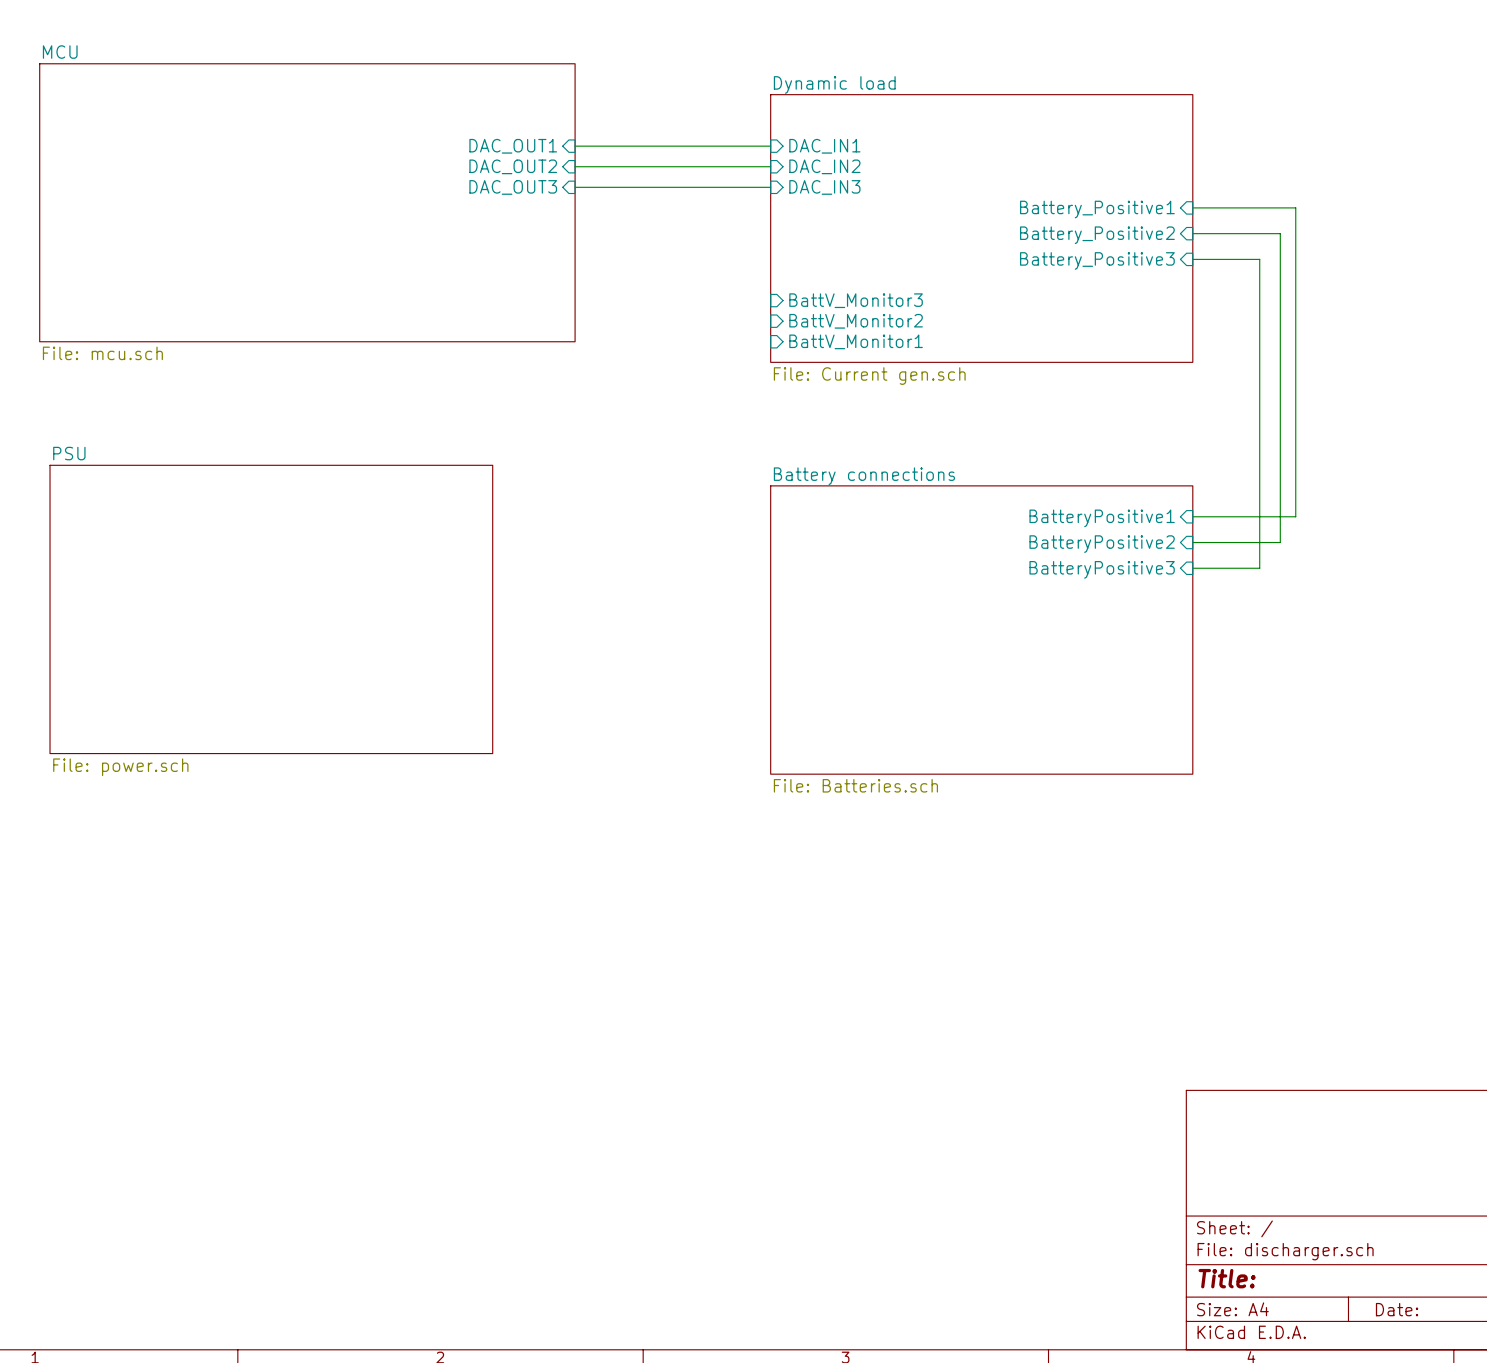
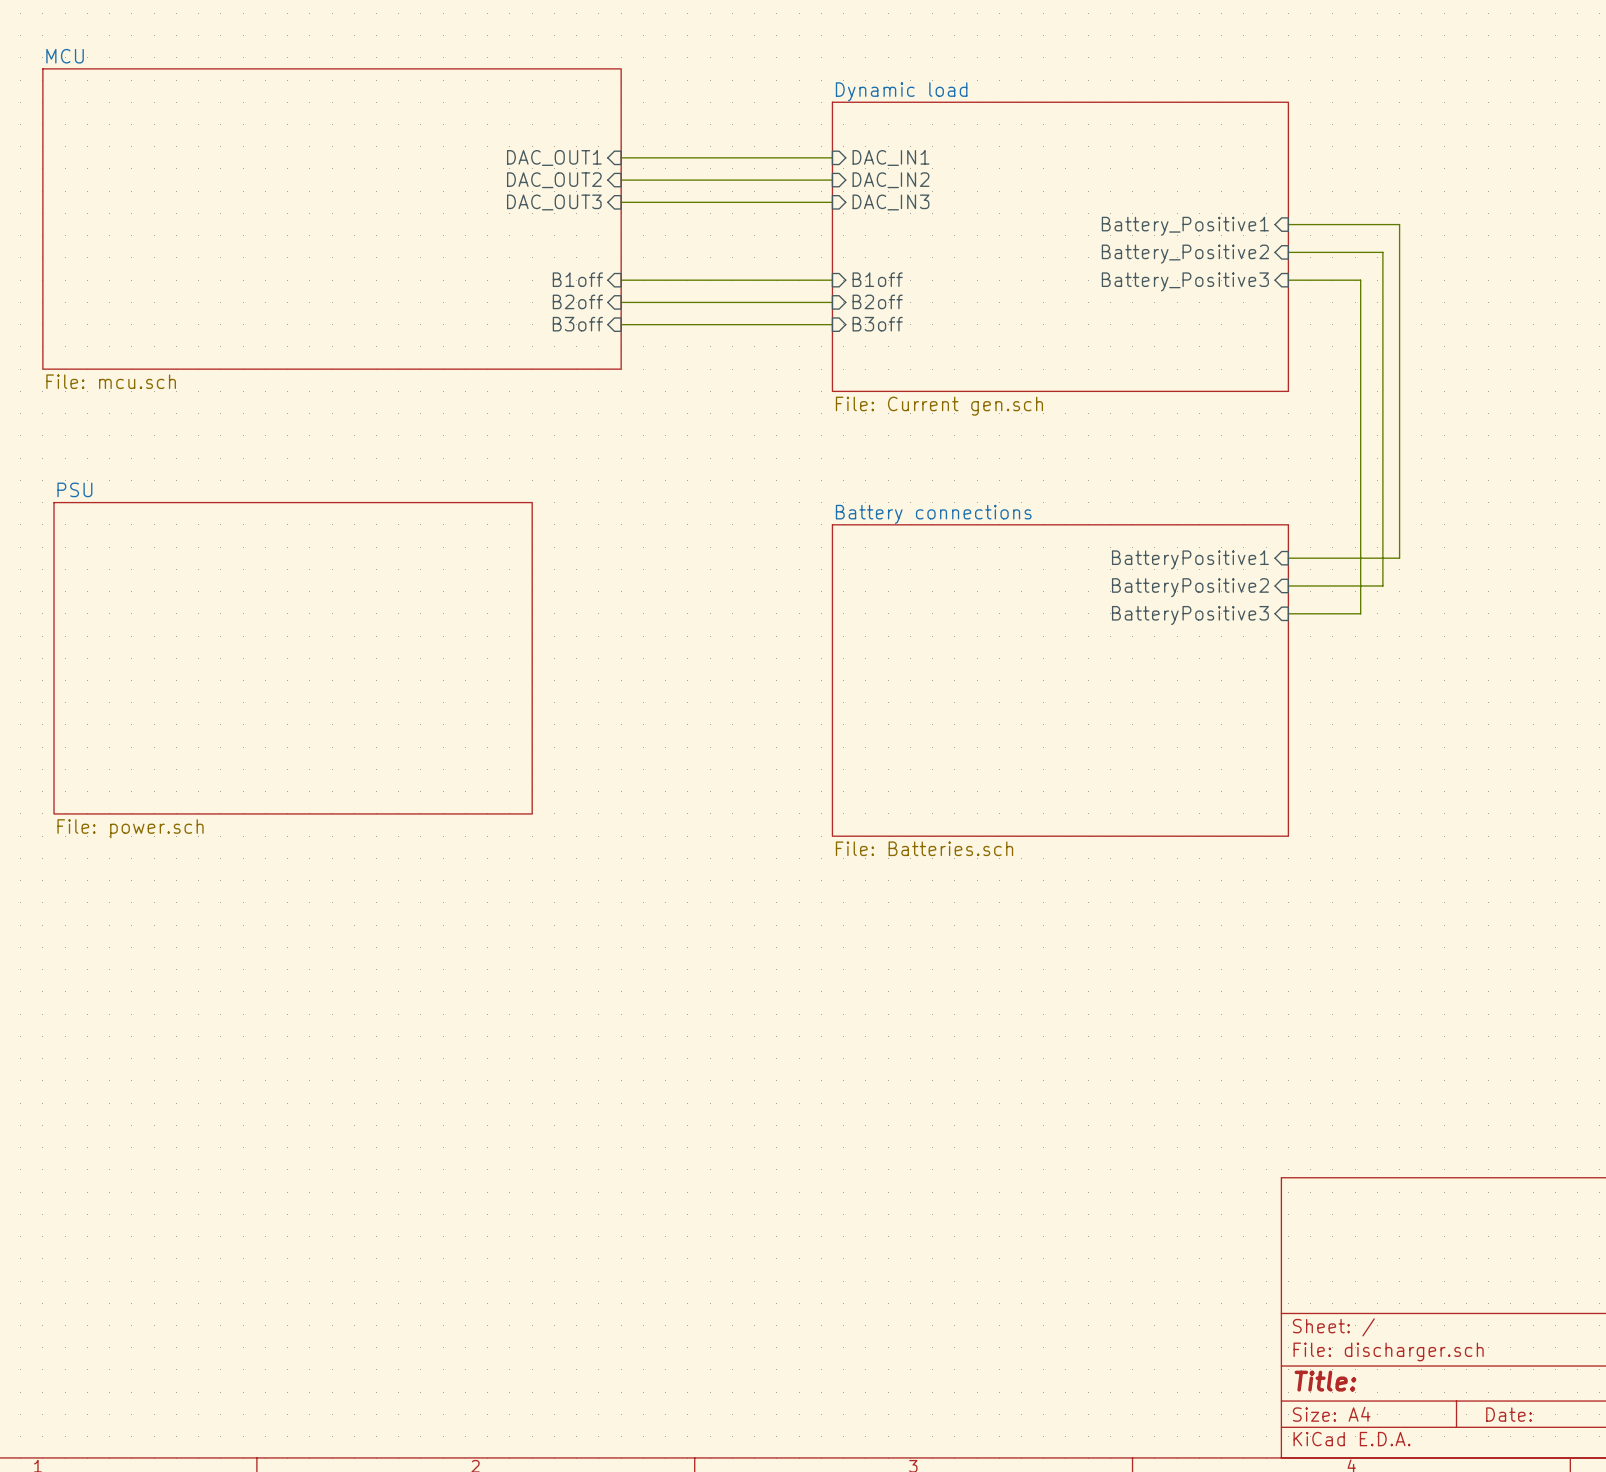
sheet pin: none -> B1off (577, 279)
sheet pin: none -> B1off (877, 279)
wire: none -> (621, 280) (832, 280)
sheet pin: none -> B2off (577, 301)
wire: none -> (621, 302) (832, 302)
sheet pin: none -> B2off (877, 301)
sheet pin: none -> B3off (577, 324)
wire: none -> (621, 324) (832, 324)
sheet pin: BattV_Monitor3 (856, 300) -> B3off (877, 324)
sheet pin: BattV_Monitor2 (856, 321) -> none
sheet pin: BattV_Monitor1 (856, 341) -> none

